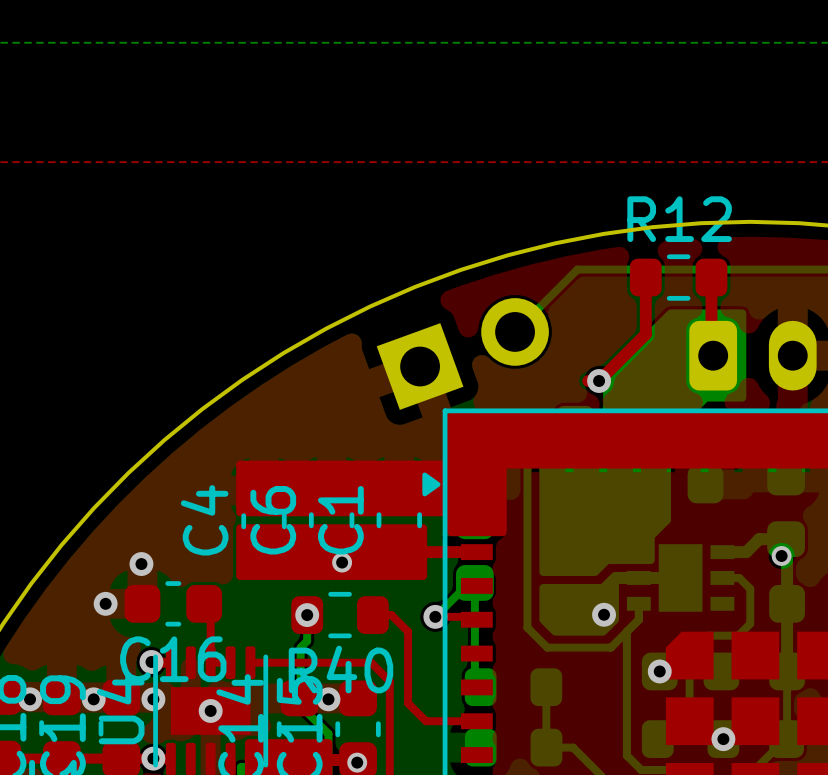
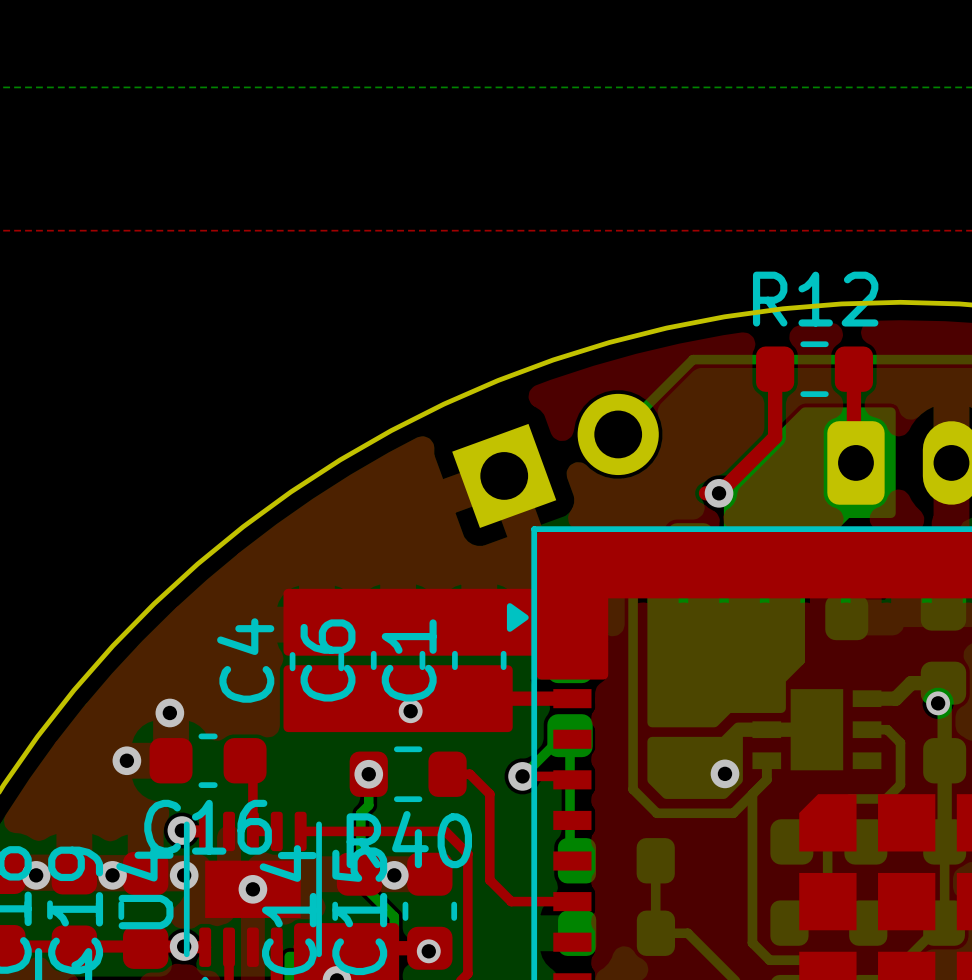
via: (659, 671) -> none
via: (723, 739) -> none

